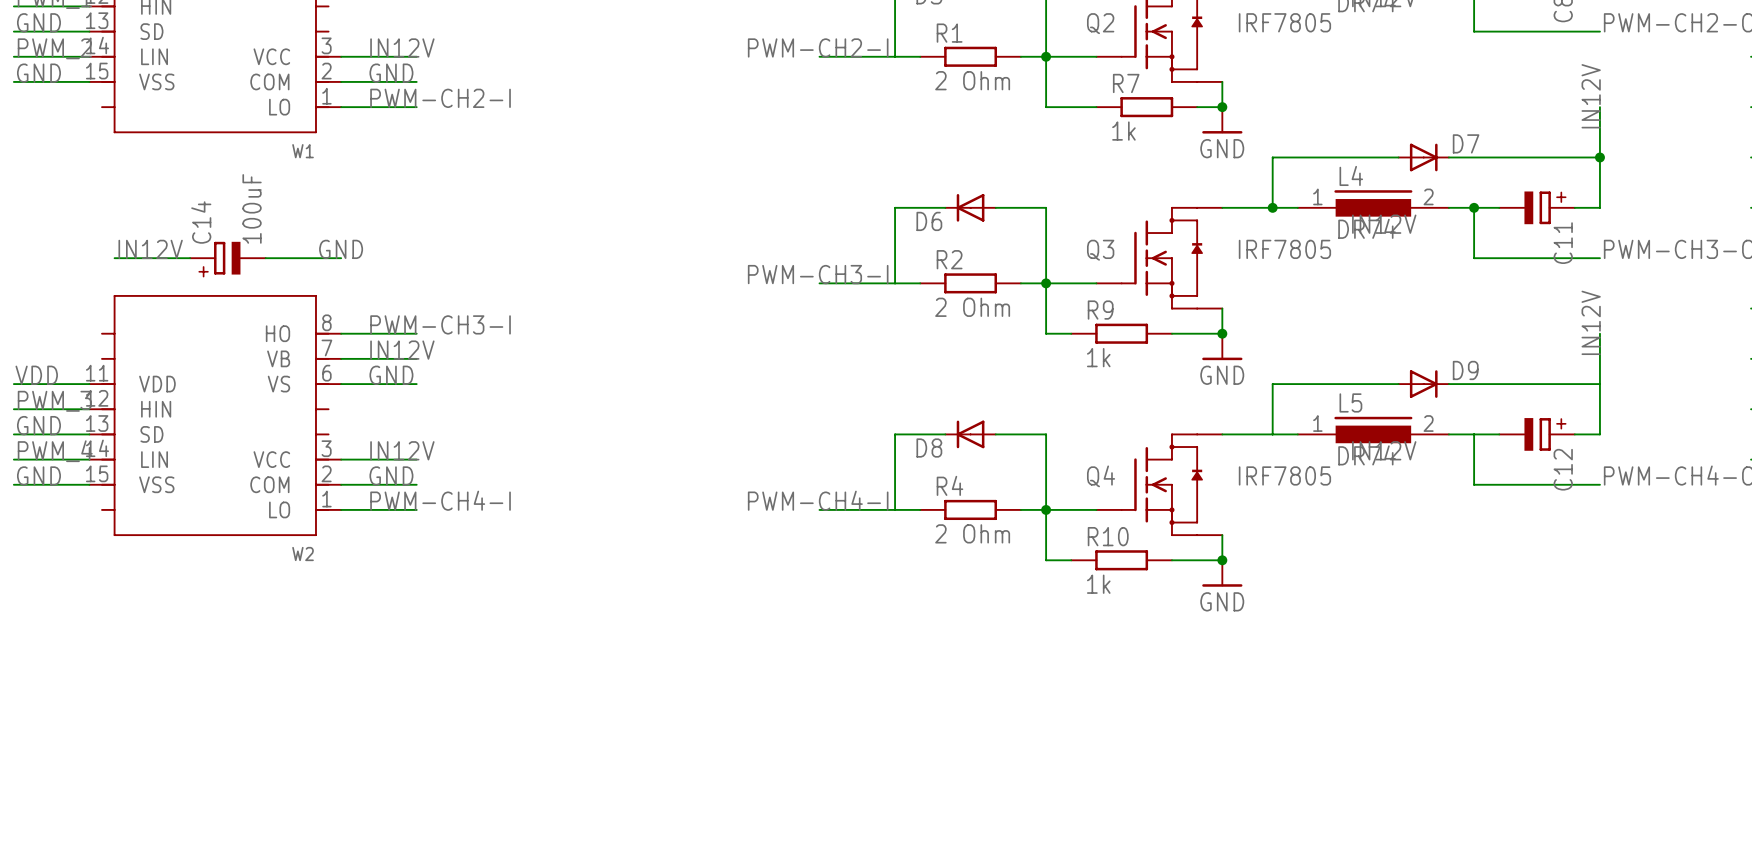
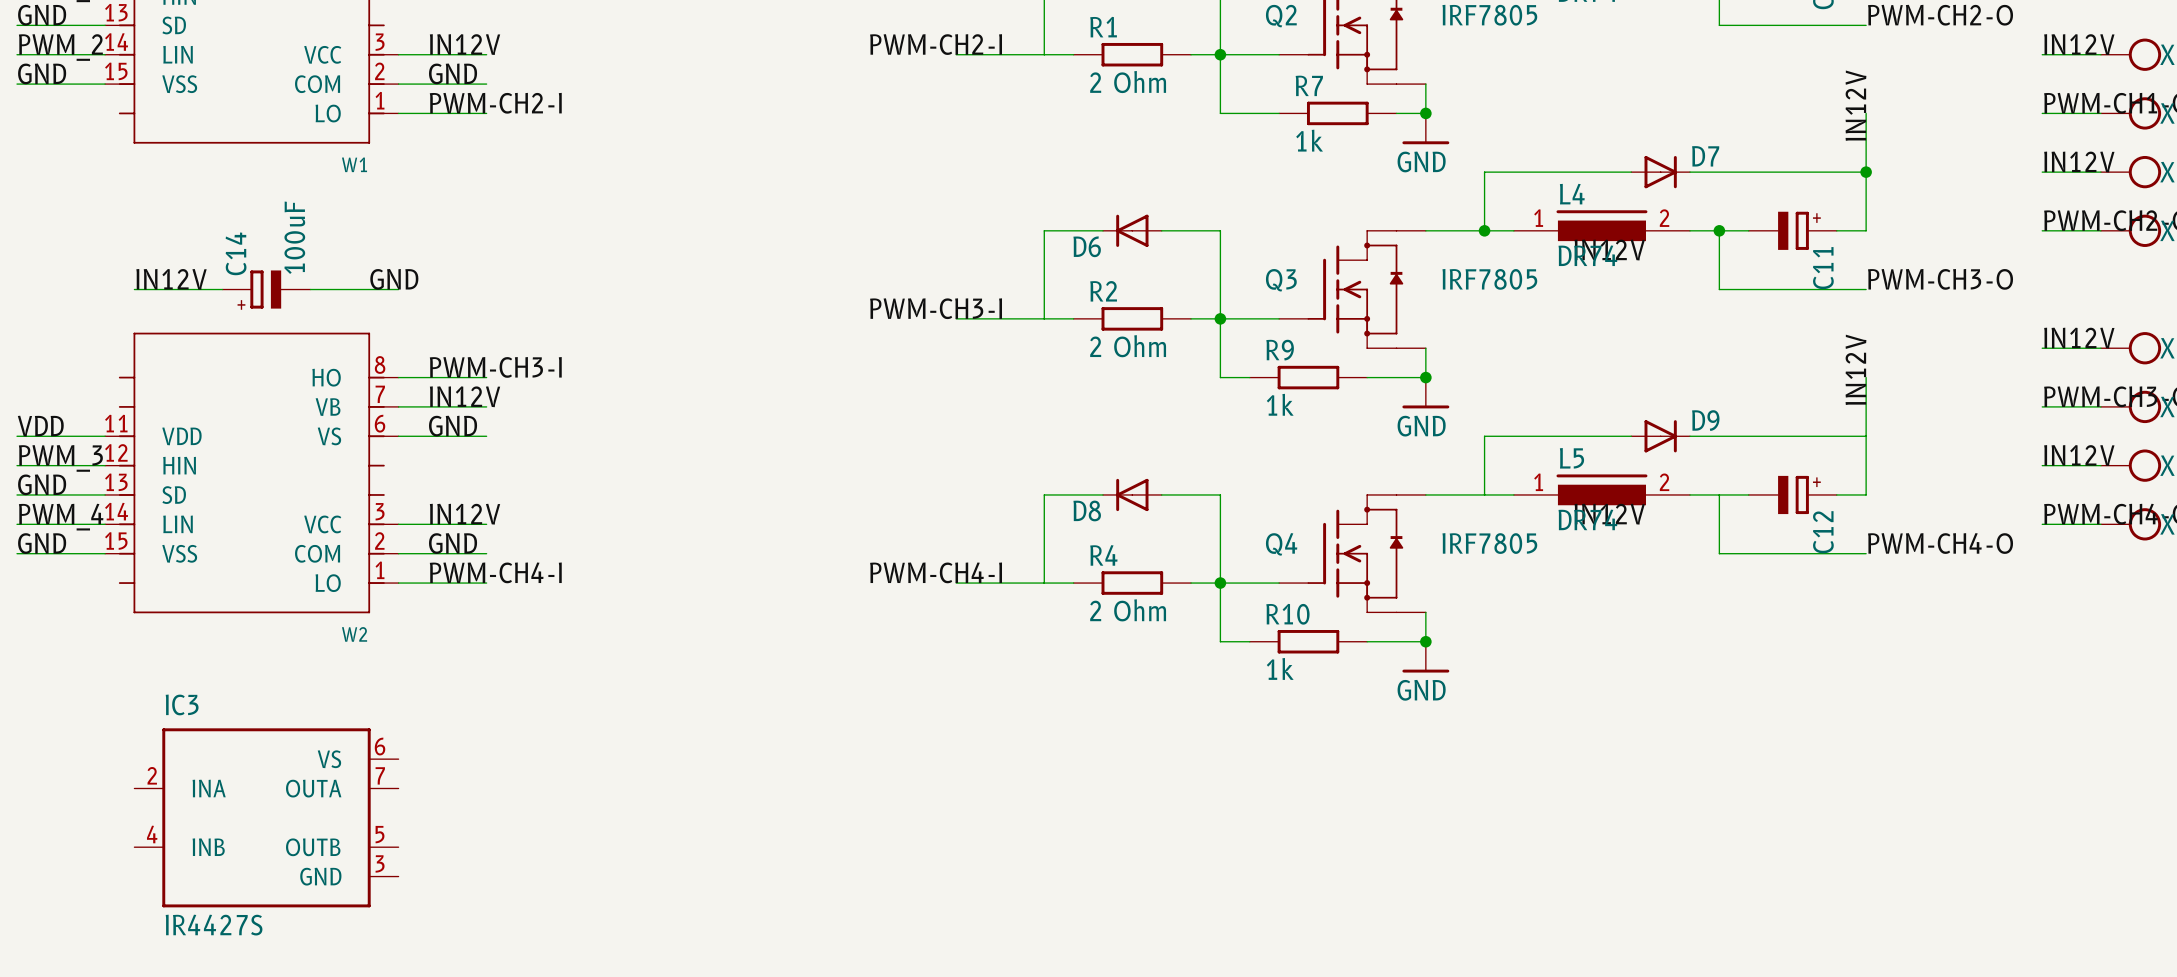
IC3: none -> IR4427S (266, 817)

